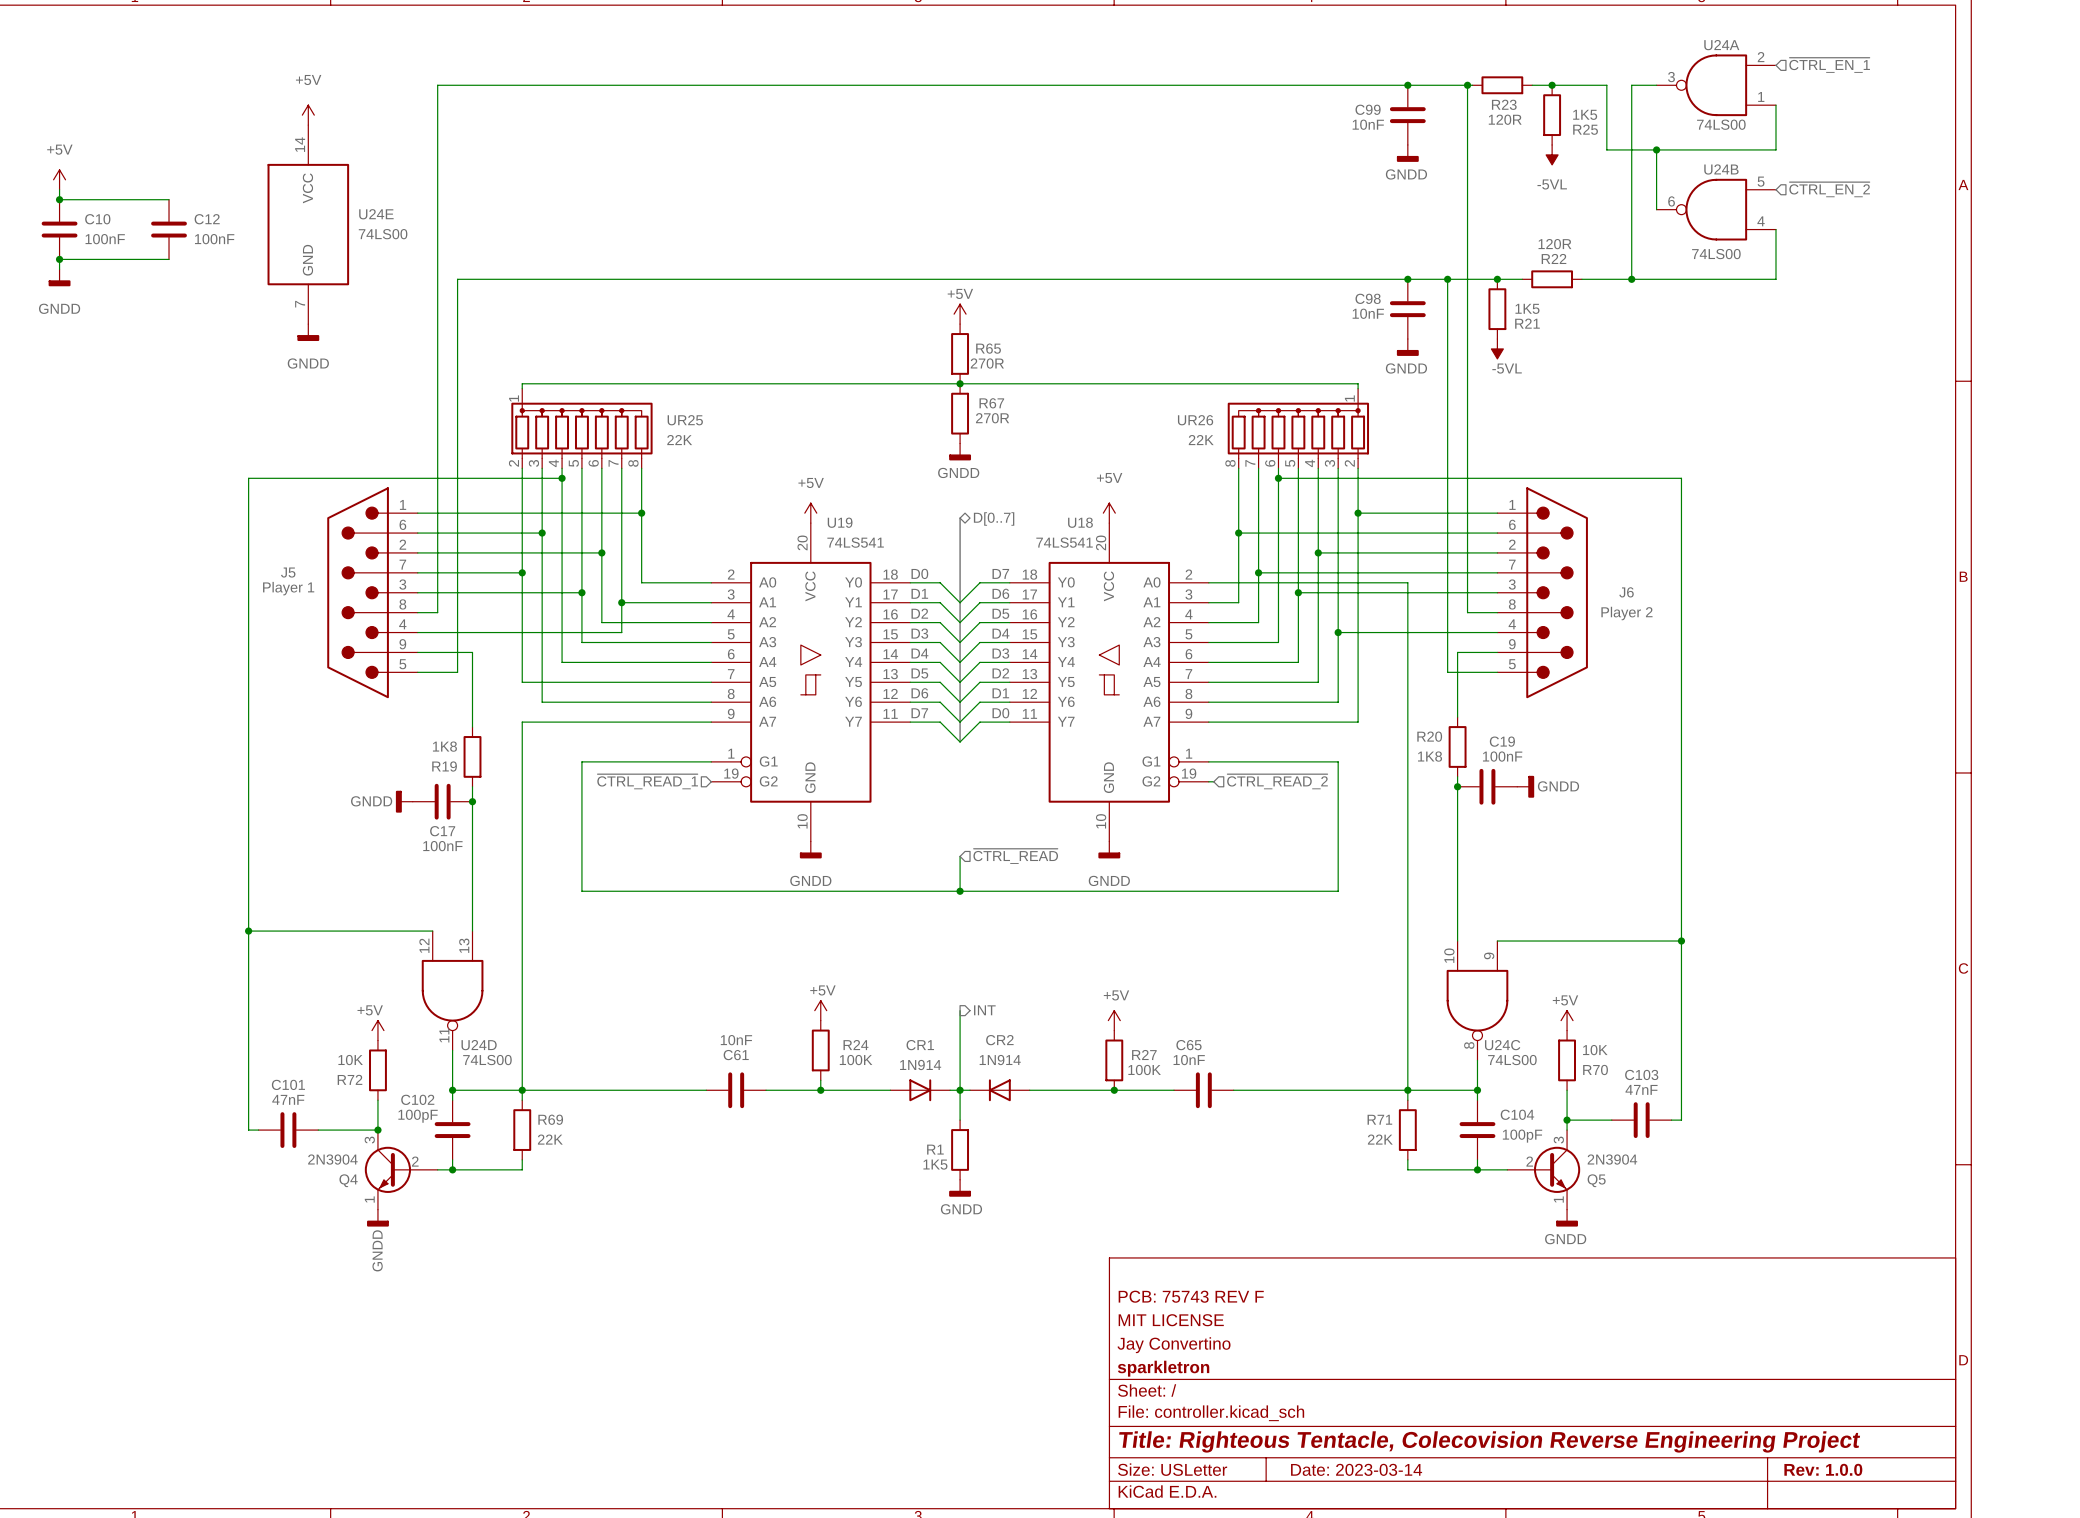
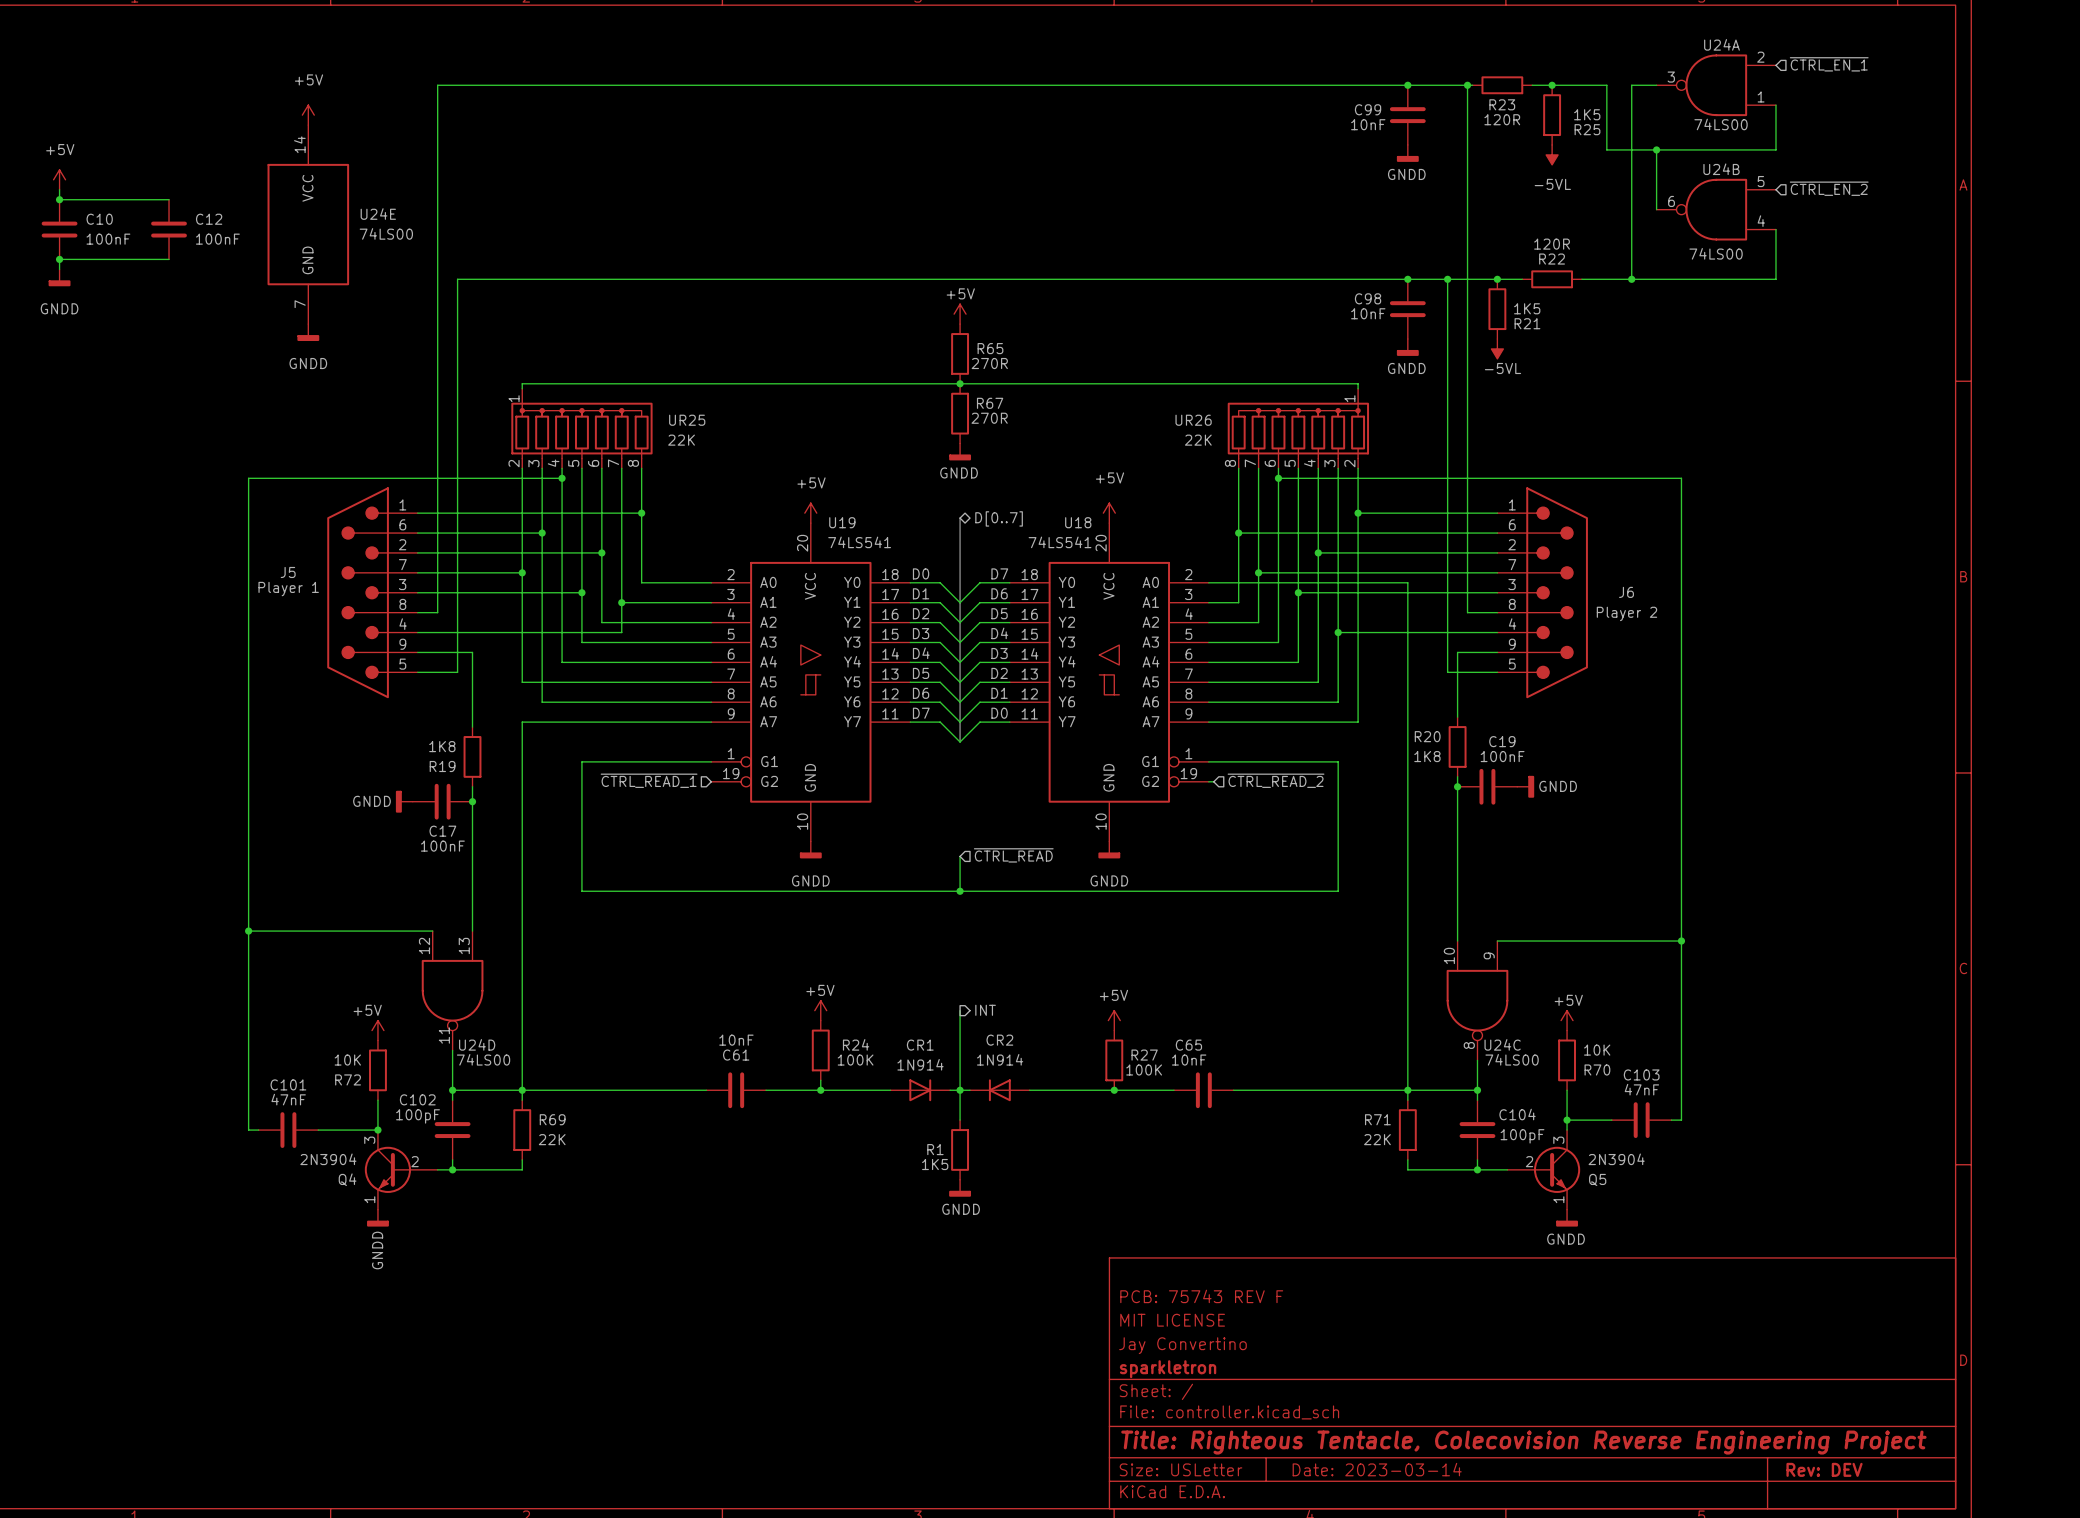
title block: Rev: 1.0.0 (1823, 1469) -> Rev: DEV (1824, 1469)

